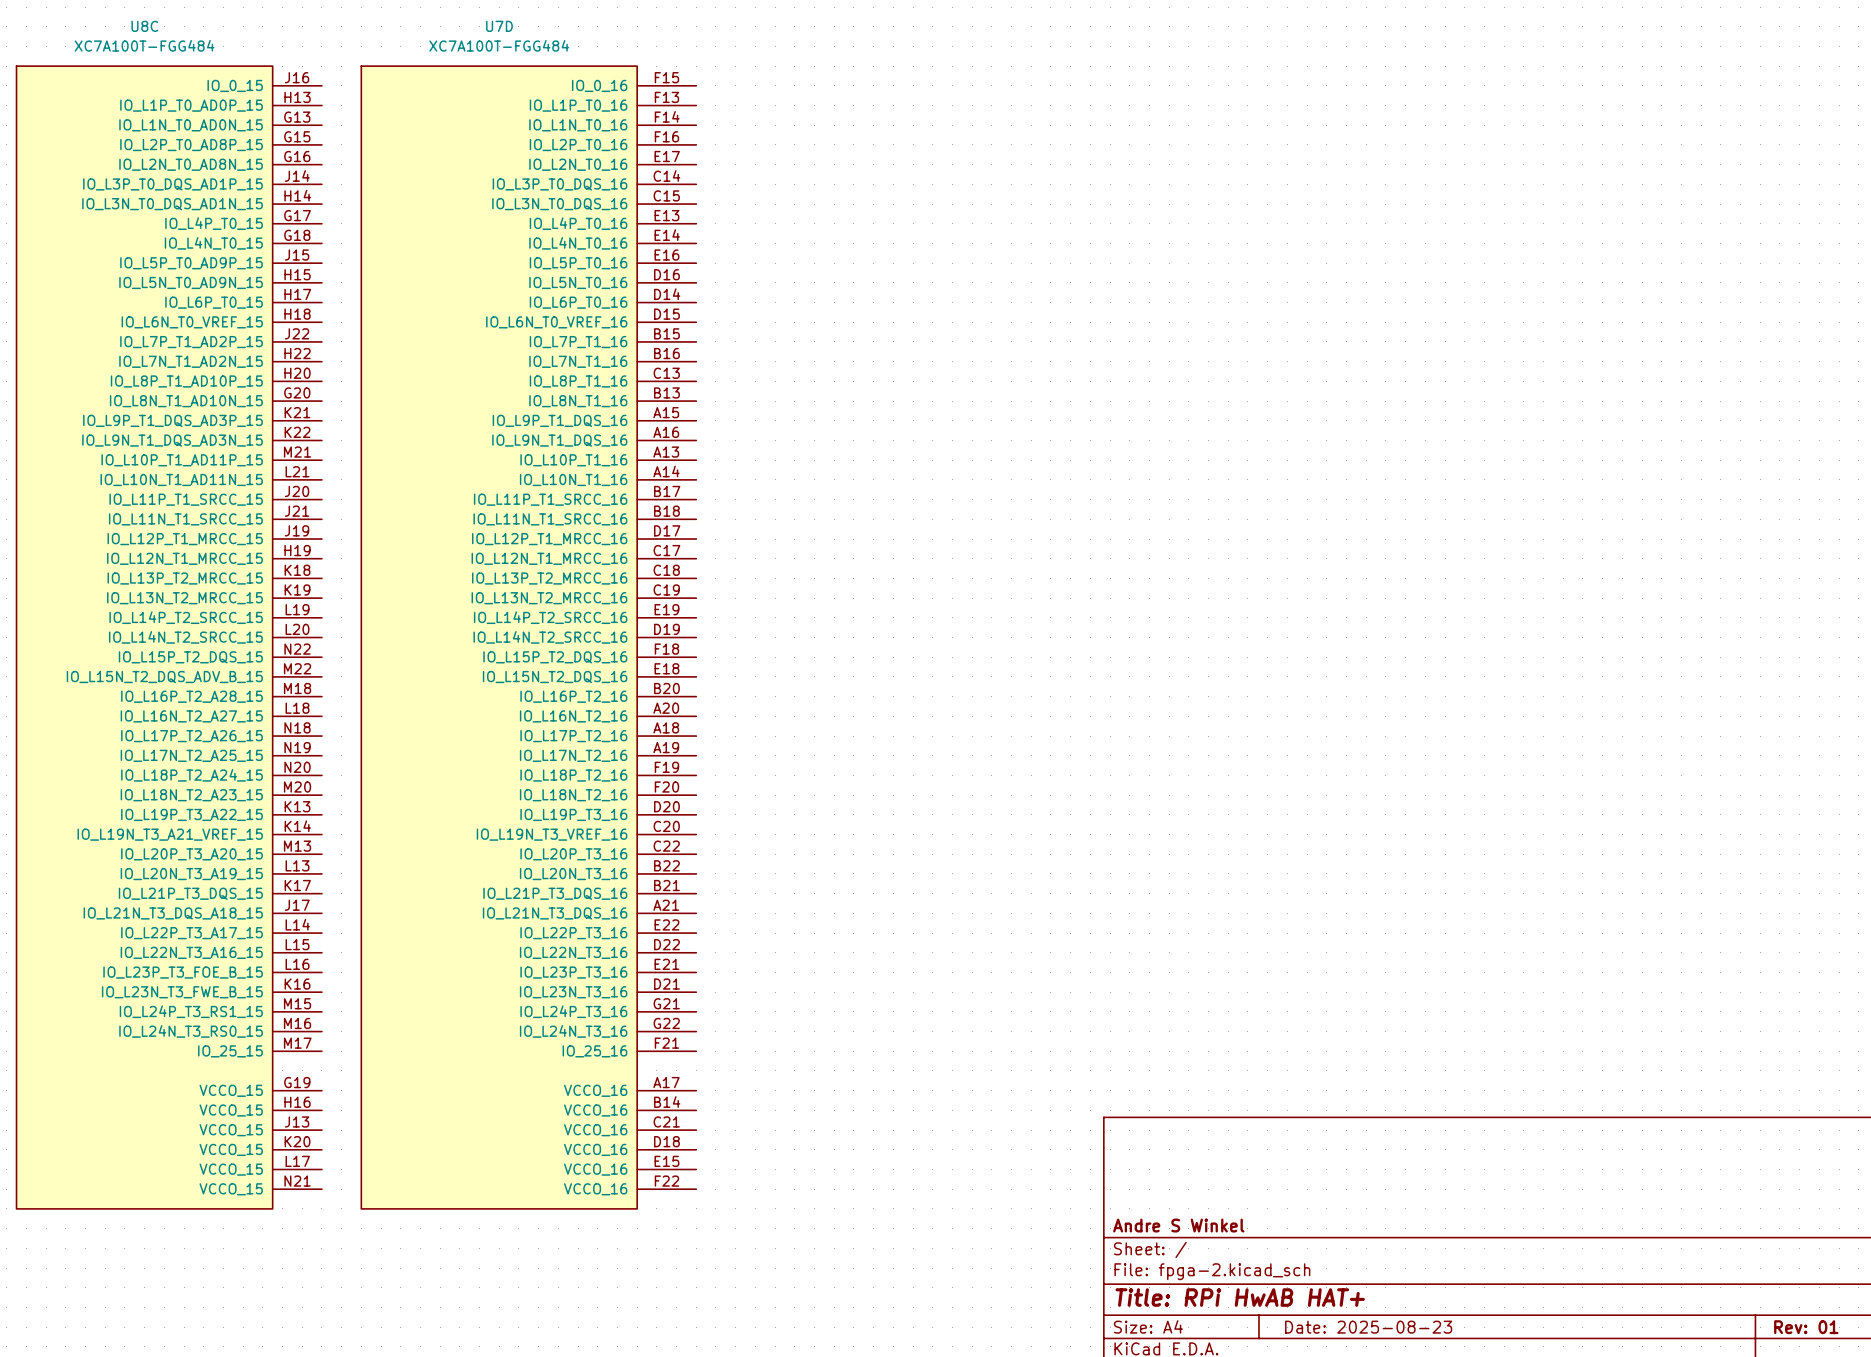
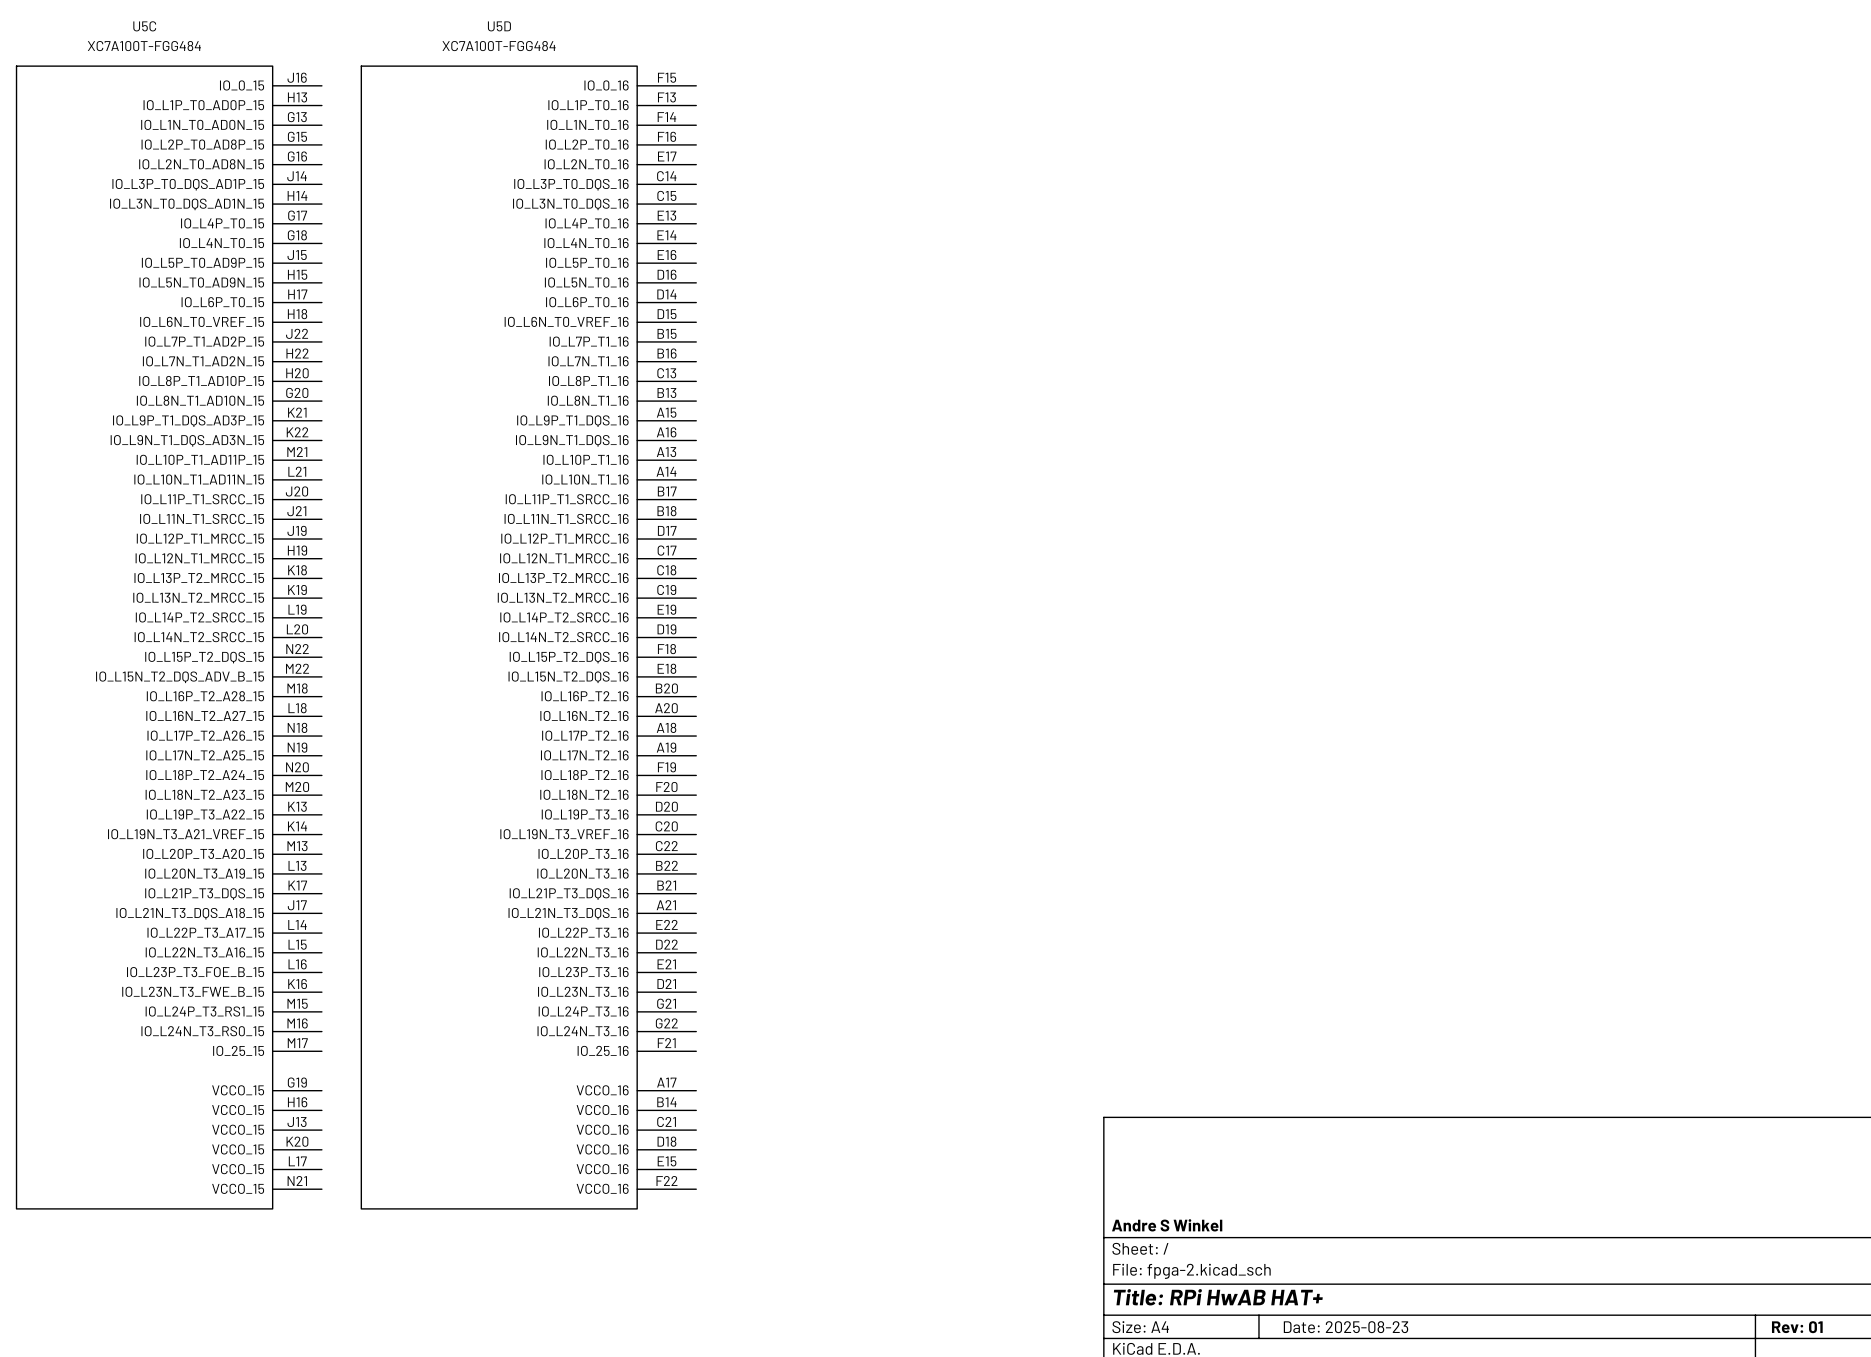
U8C name: U8C (144, 26) -> U5C (144, 26)
U7D name: U7D (499, 26) -> U5D (499, 26)

